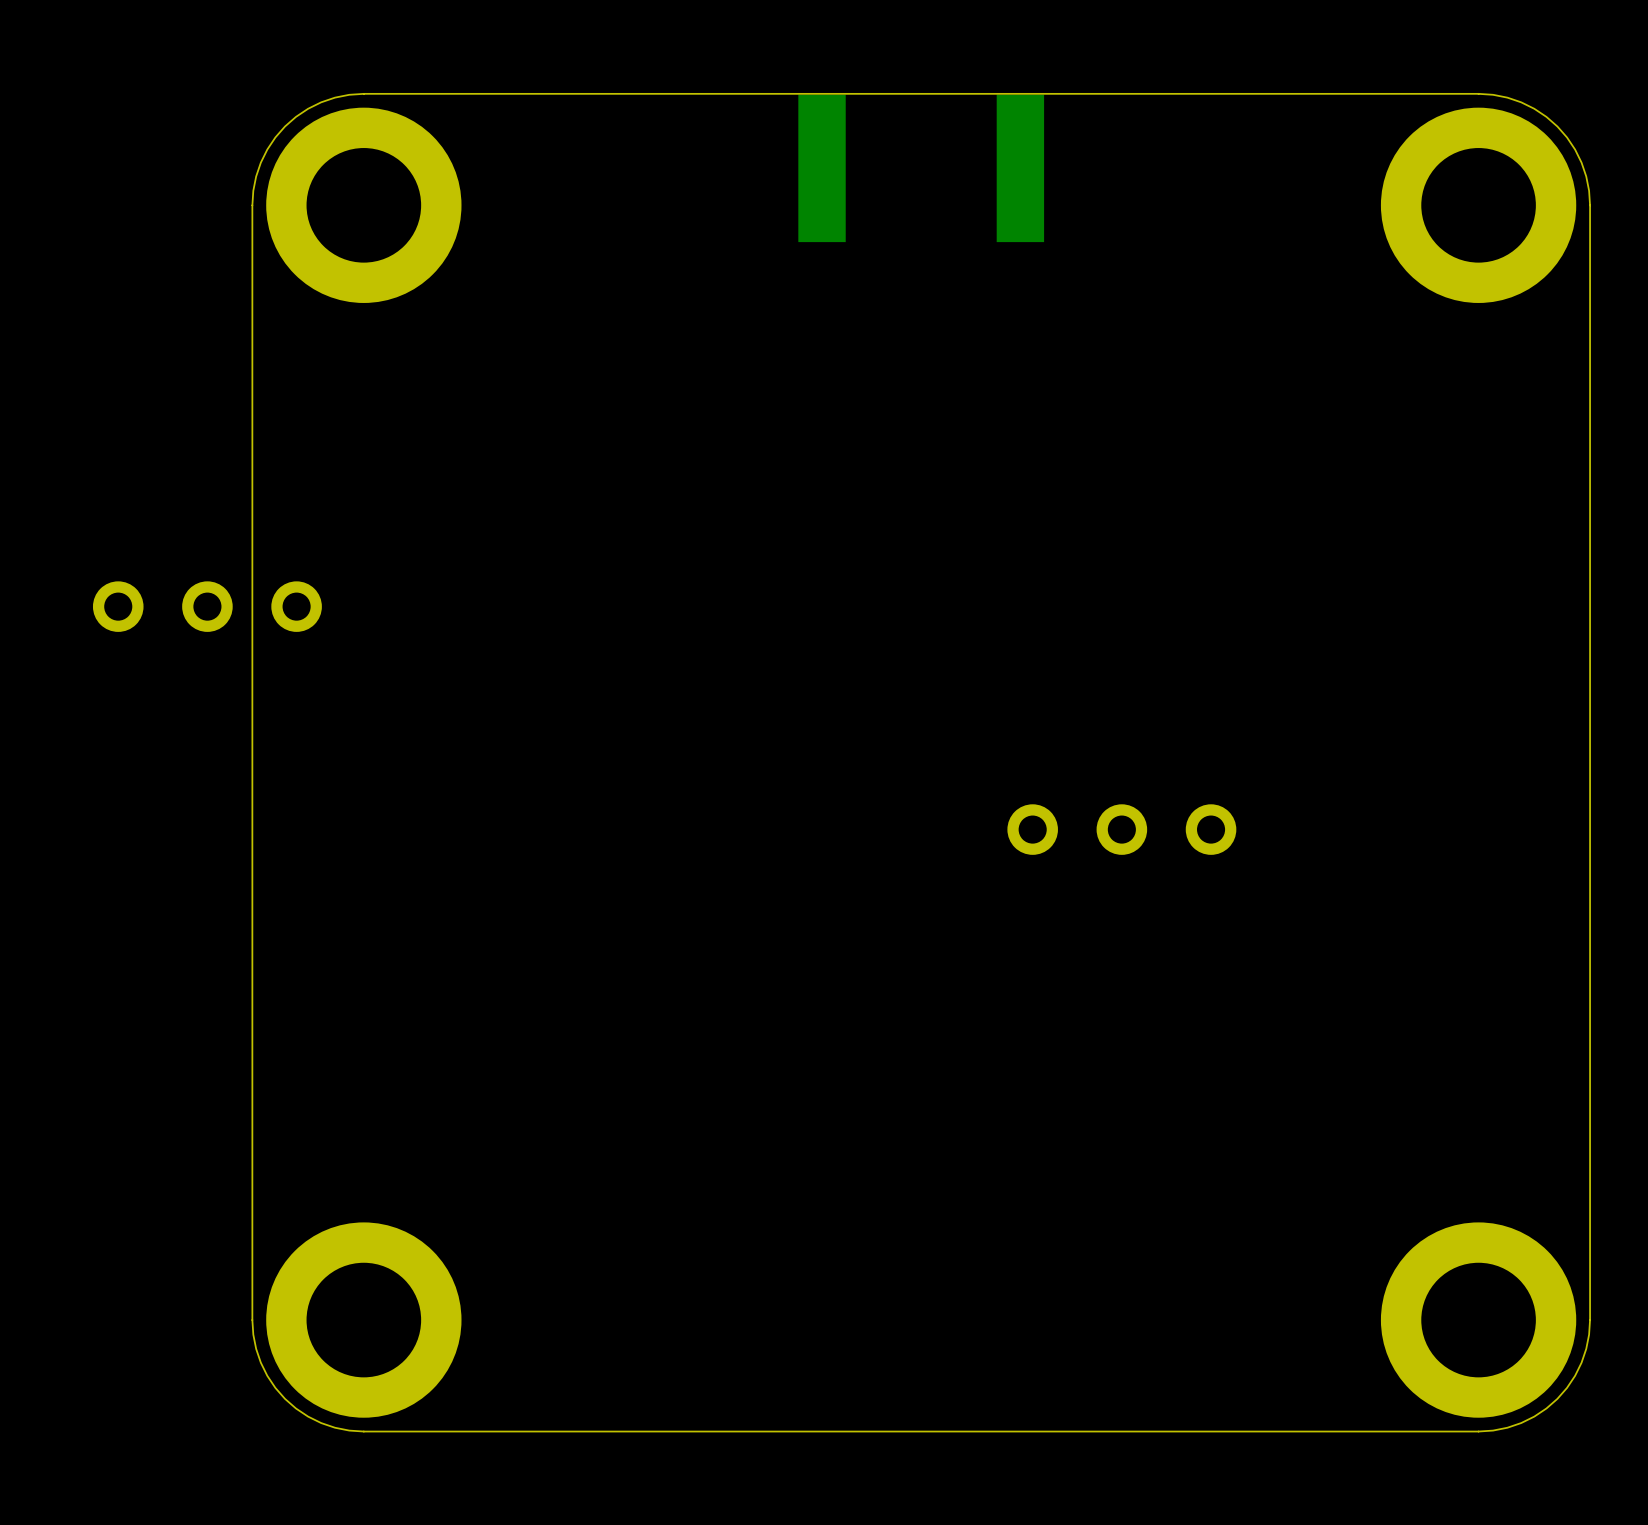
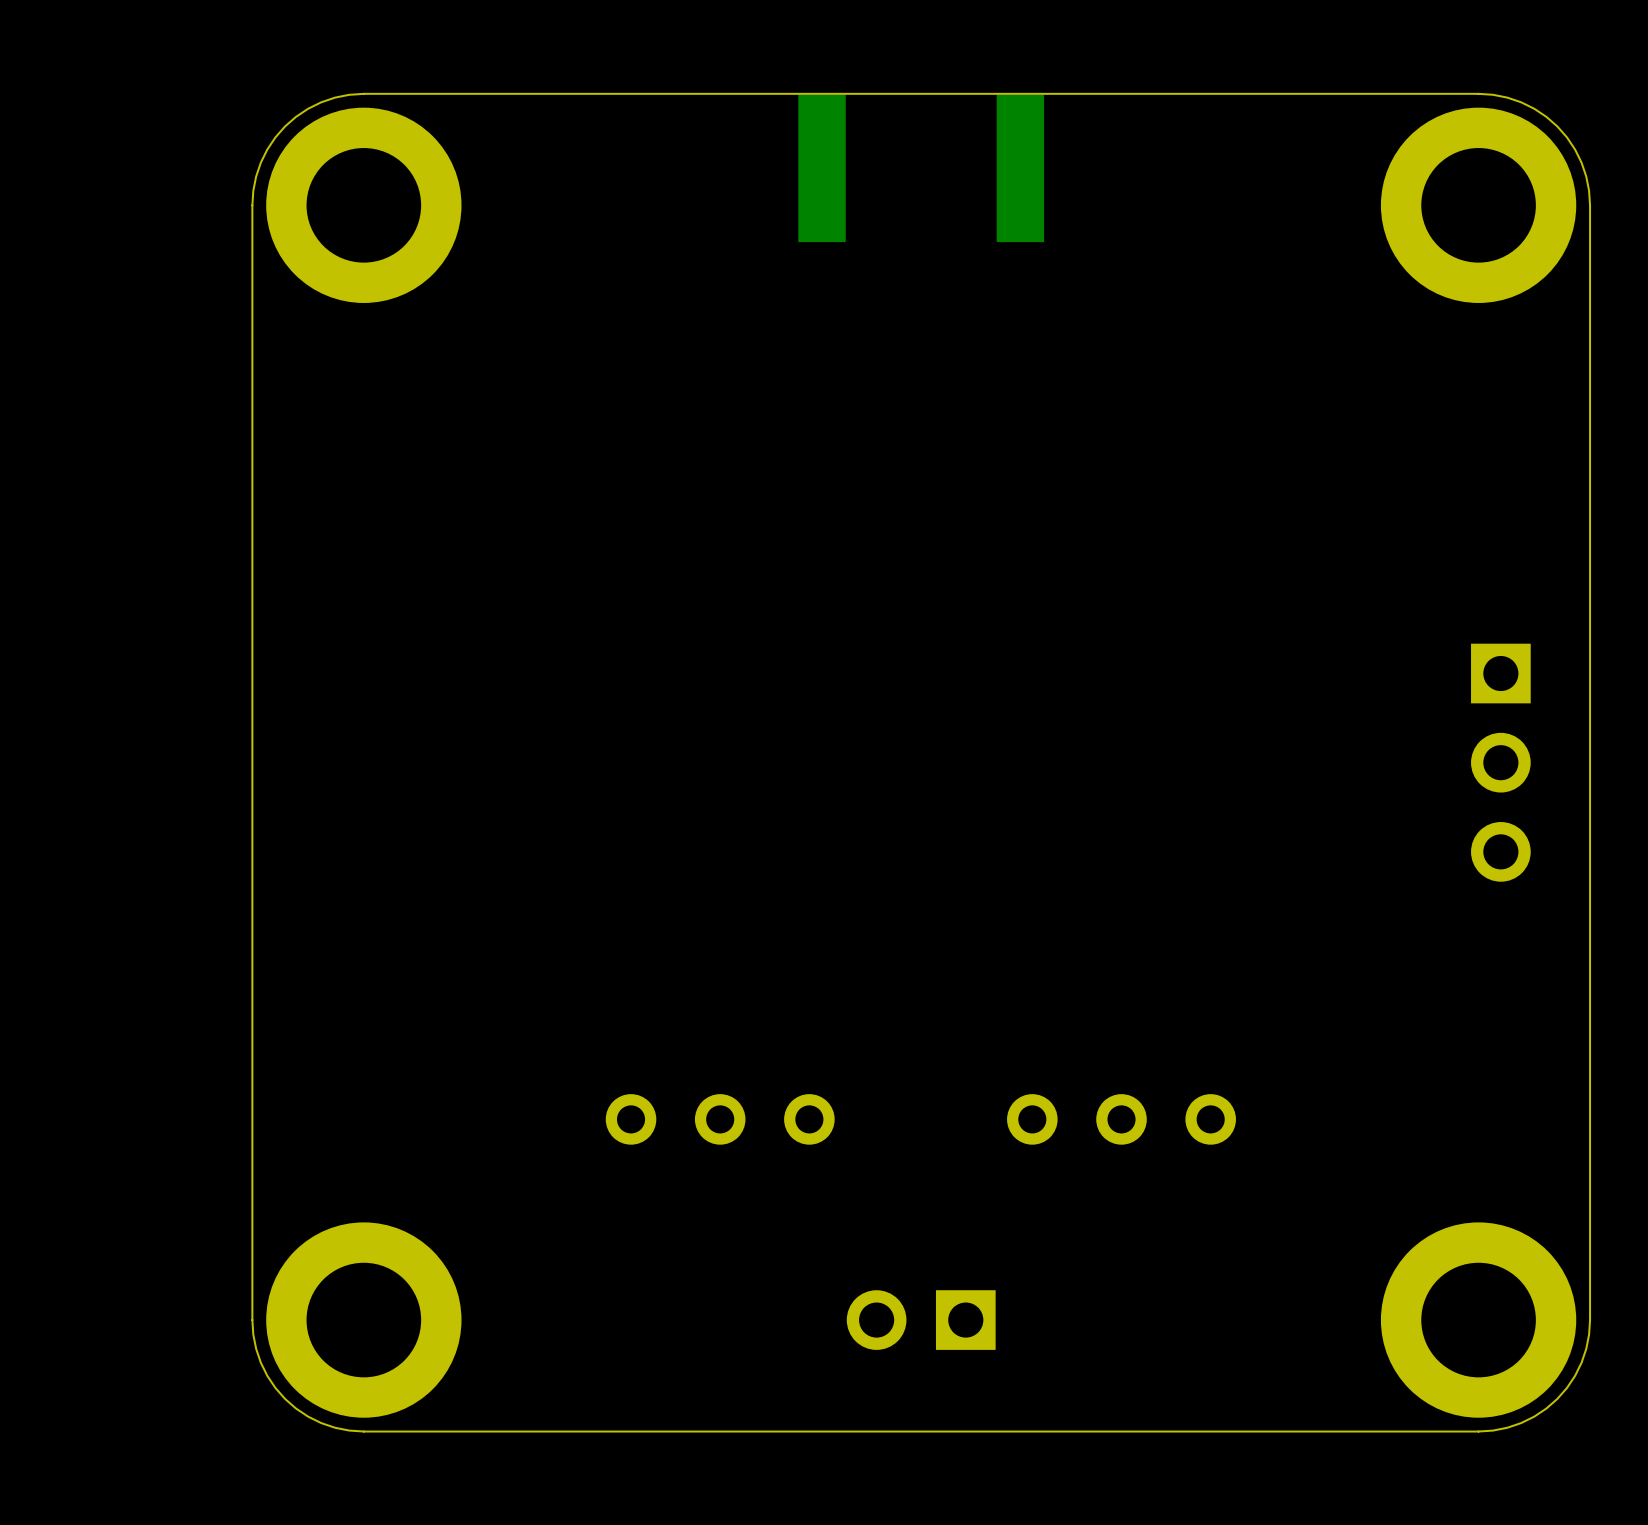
part: (207, 606) -> none
part: none -> (1500, 762)
part: (1121, 829) -> none
part: none -> (720, 1119)
part: none -> (1121, 1119)
part: none -> (921, 1320)

